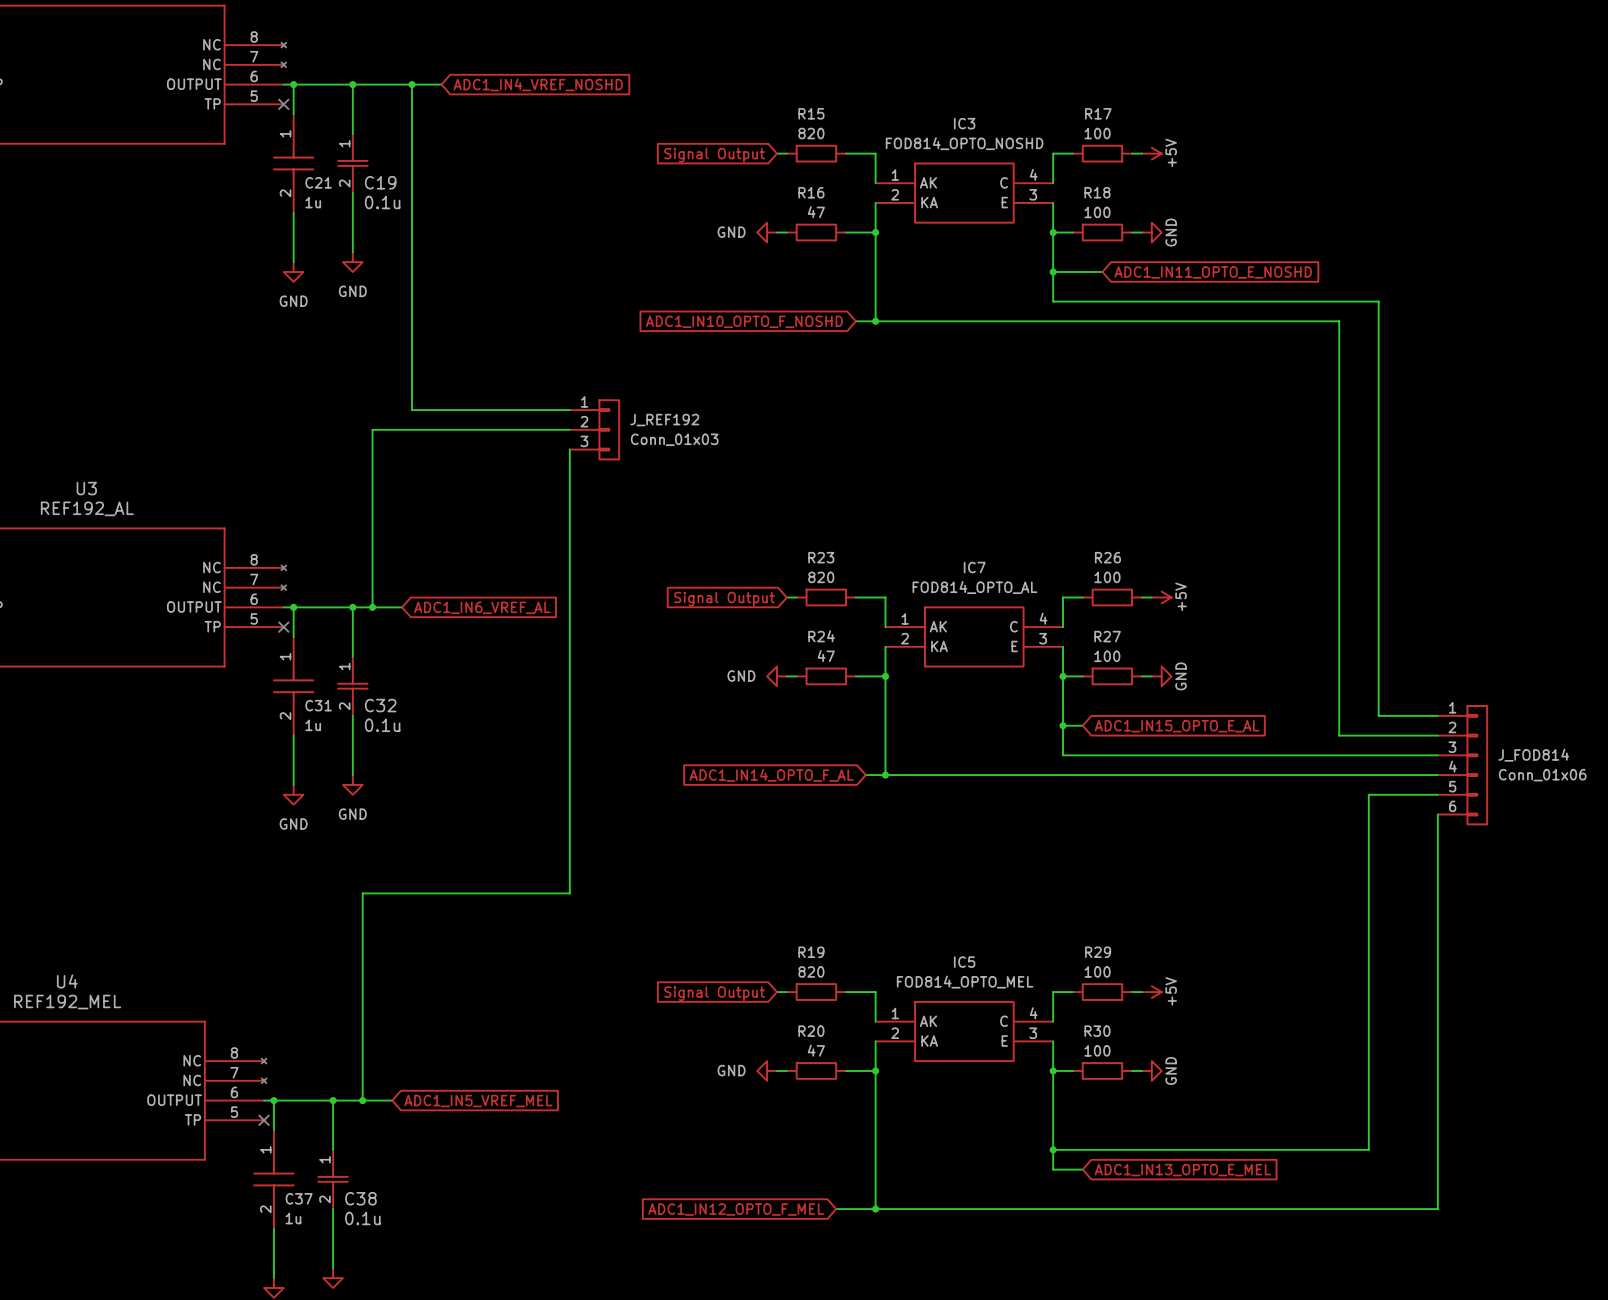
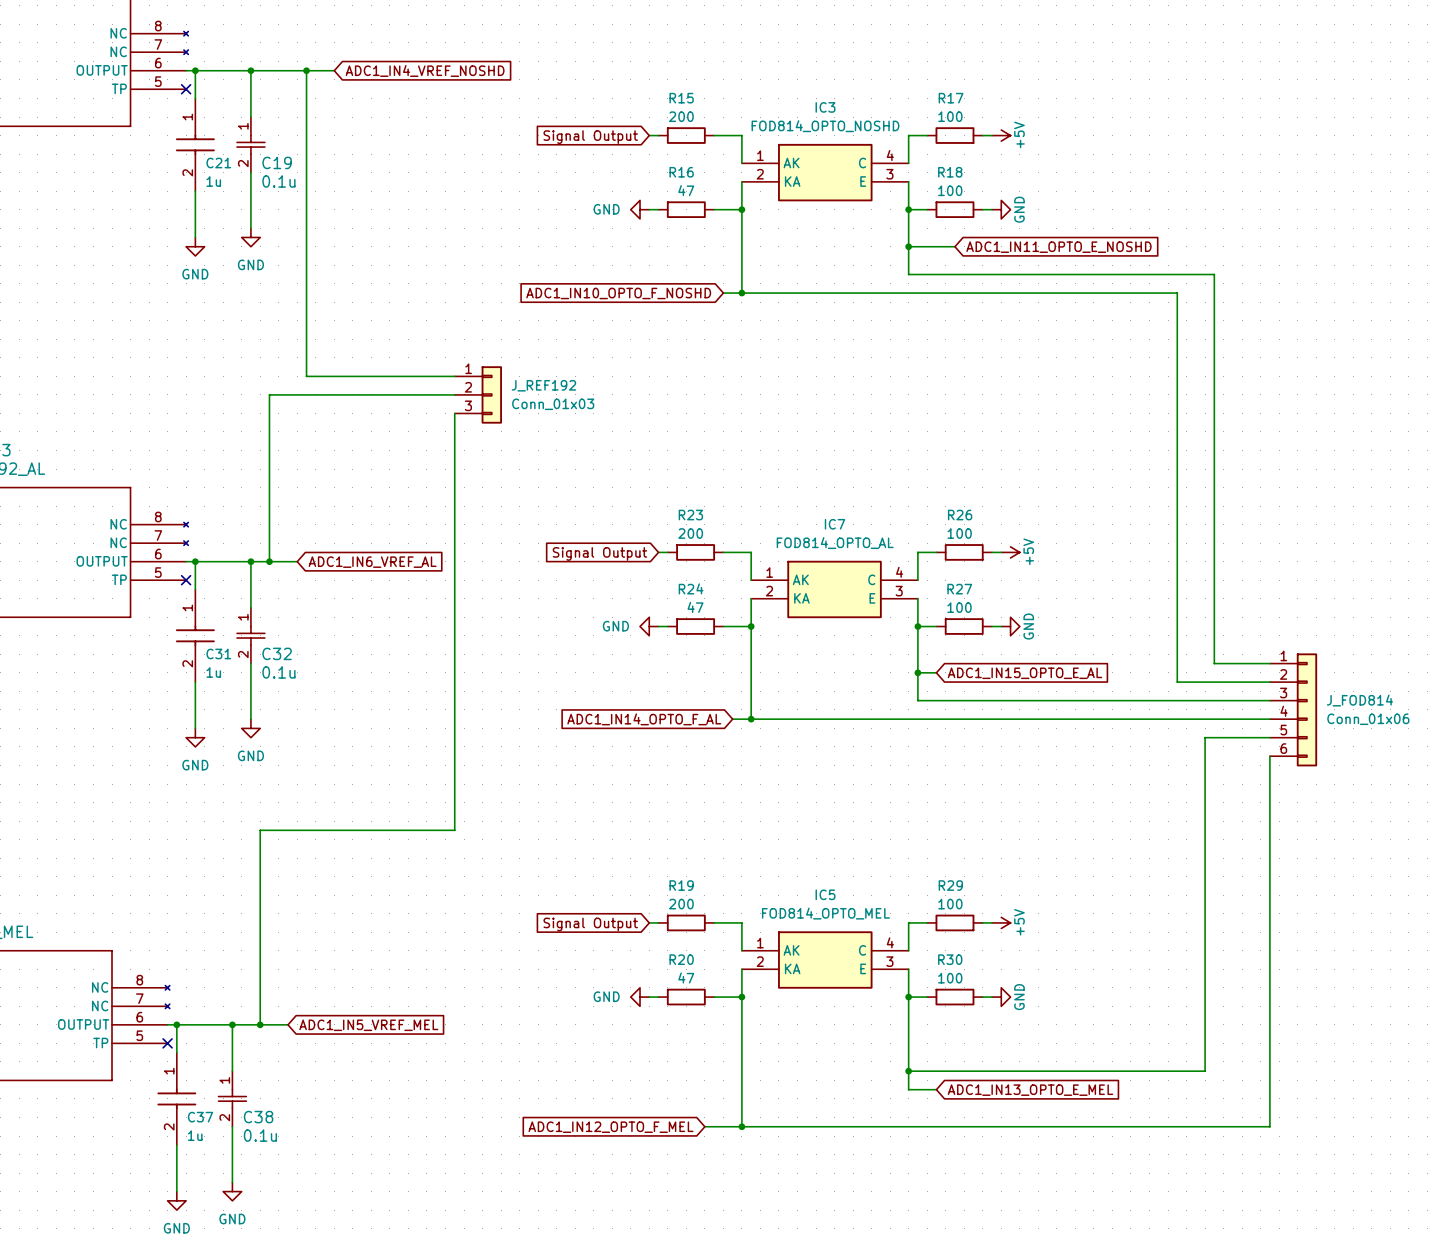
R15 value: 820 (811, 133) -> 200 (681, 116)
R23 value: 820 (821, 577) -> 200 (690, 533)
R19 value: 820 (811, 971) -> 200 (681, 904)

